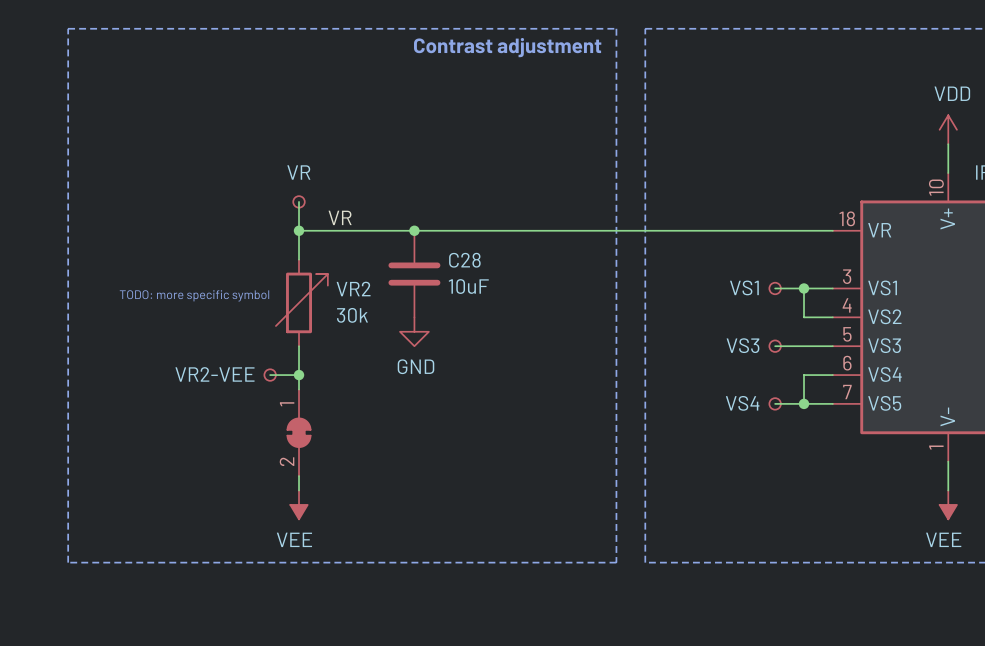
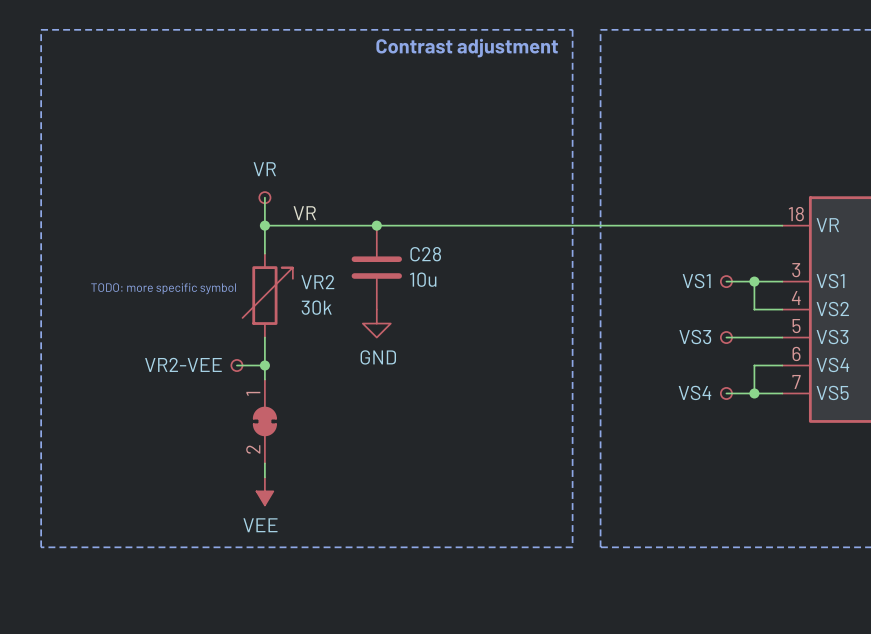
C28 value: 10uF (468, 286) -> 10u (423, 279)

